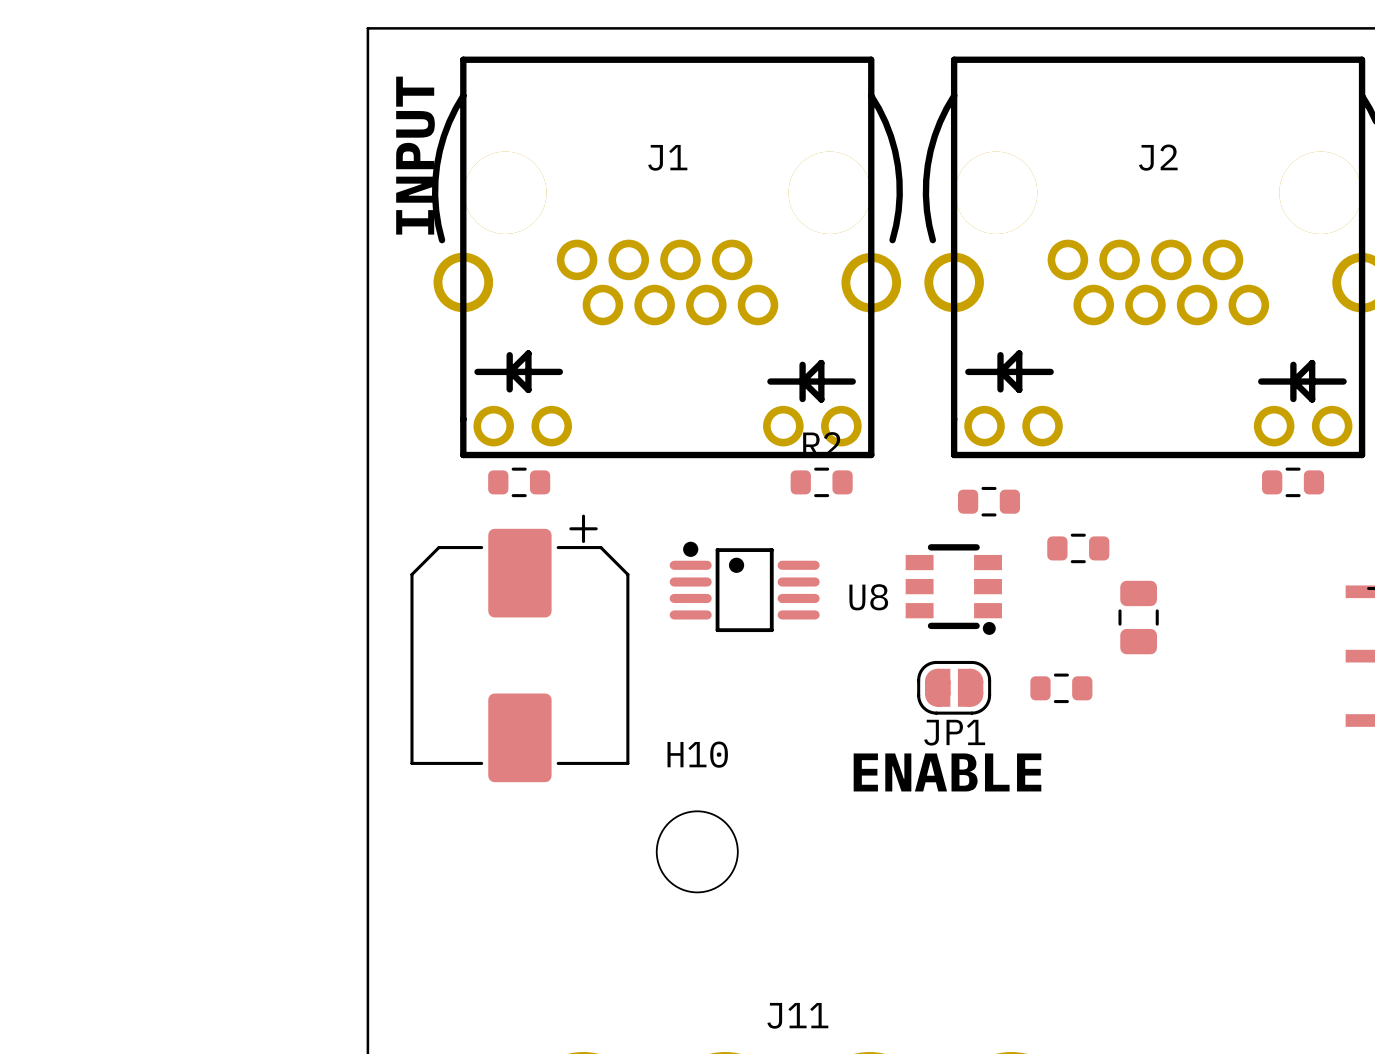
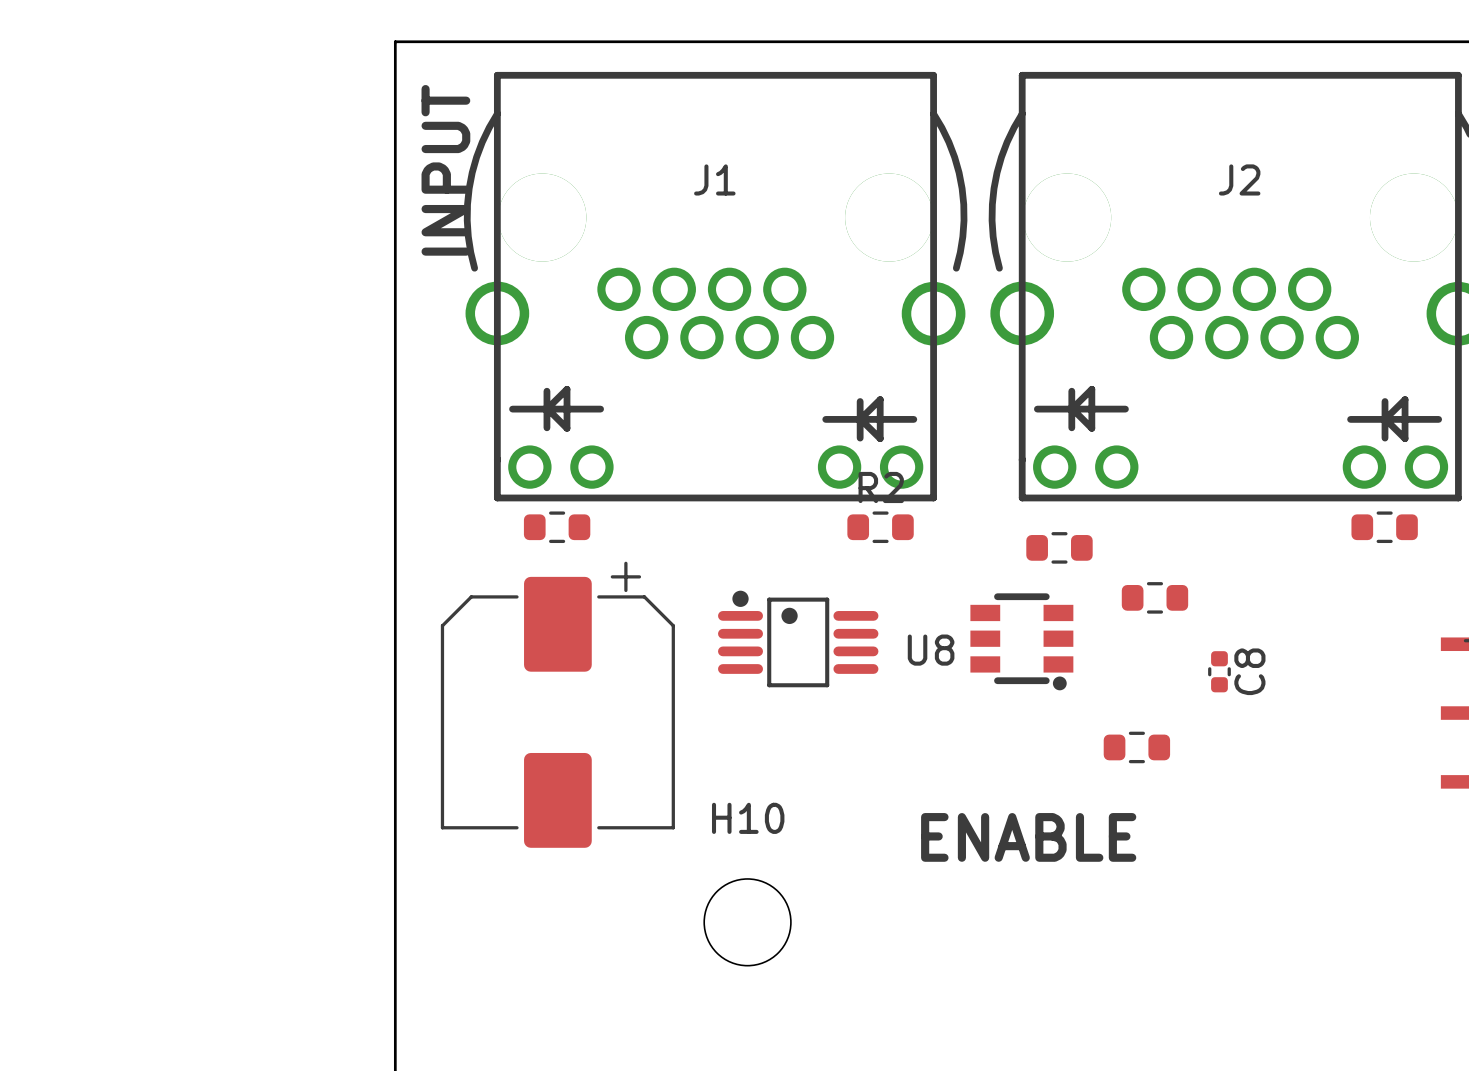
part: (1138, 617) -> none
C8: none -> (1219, 671)
JP1: (954, 687) -> none

